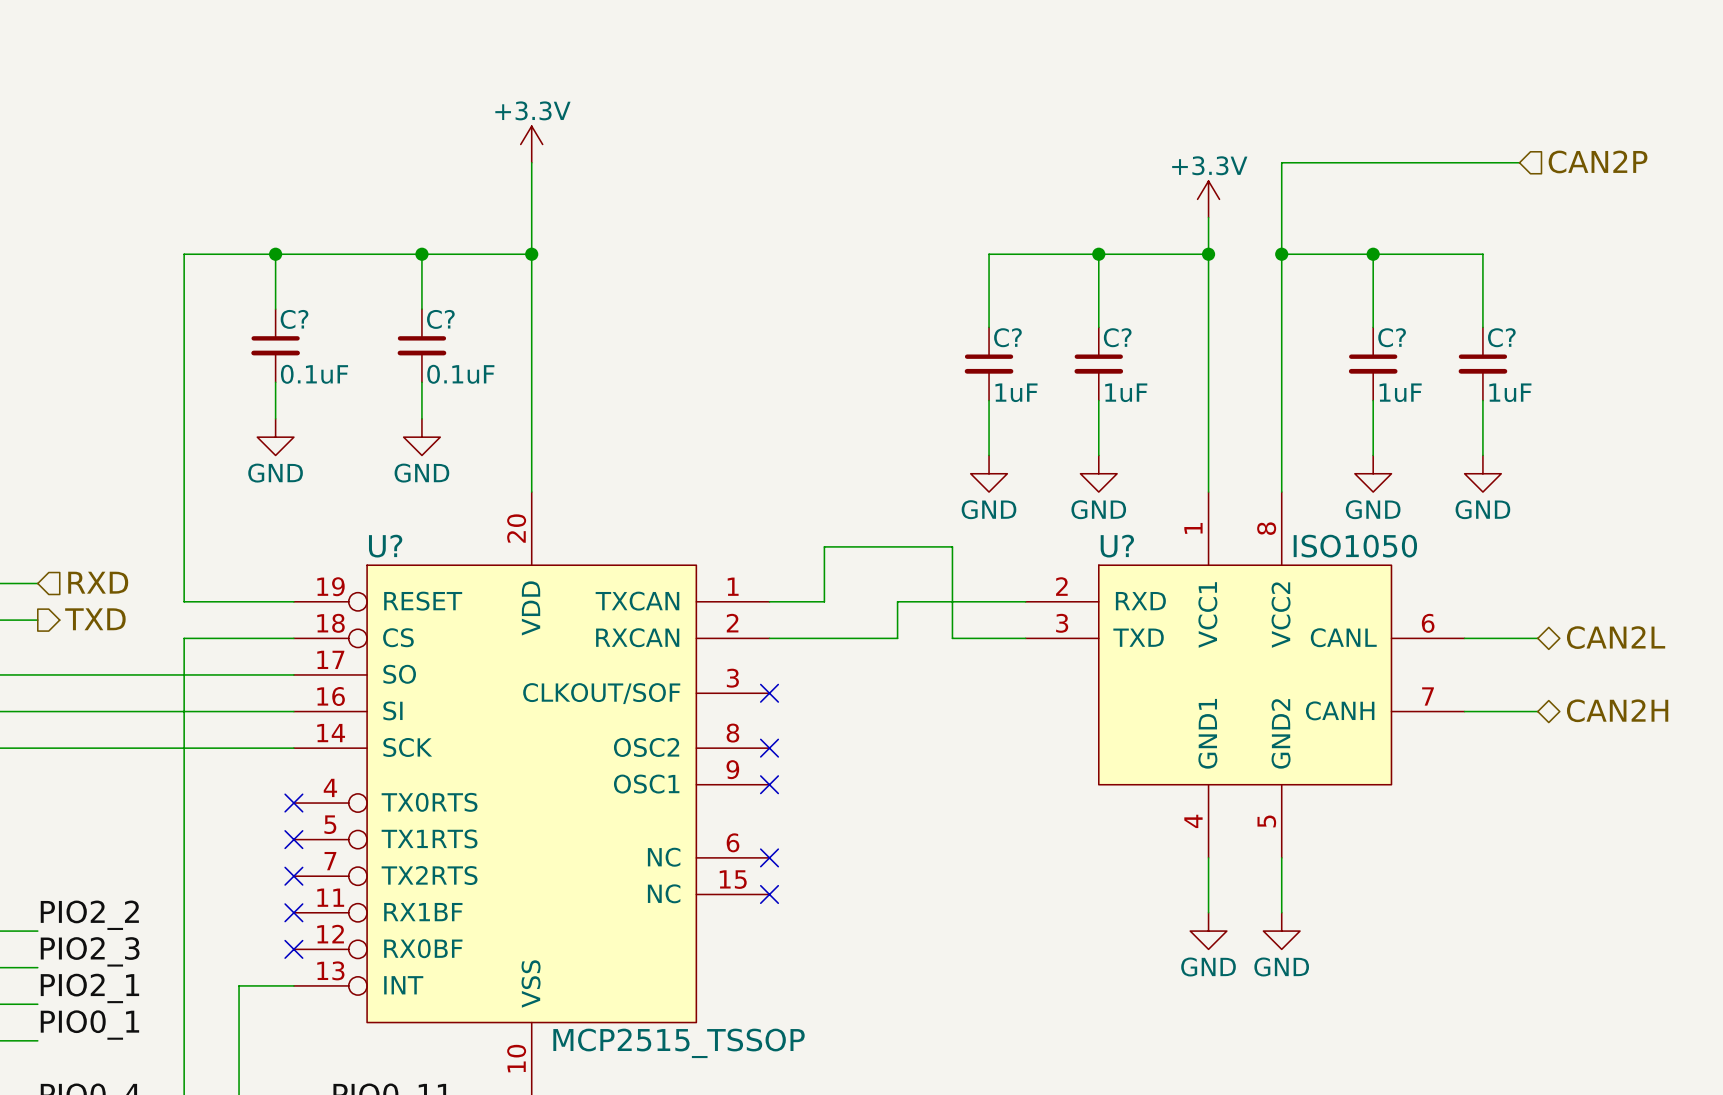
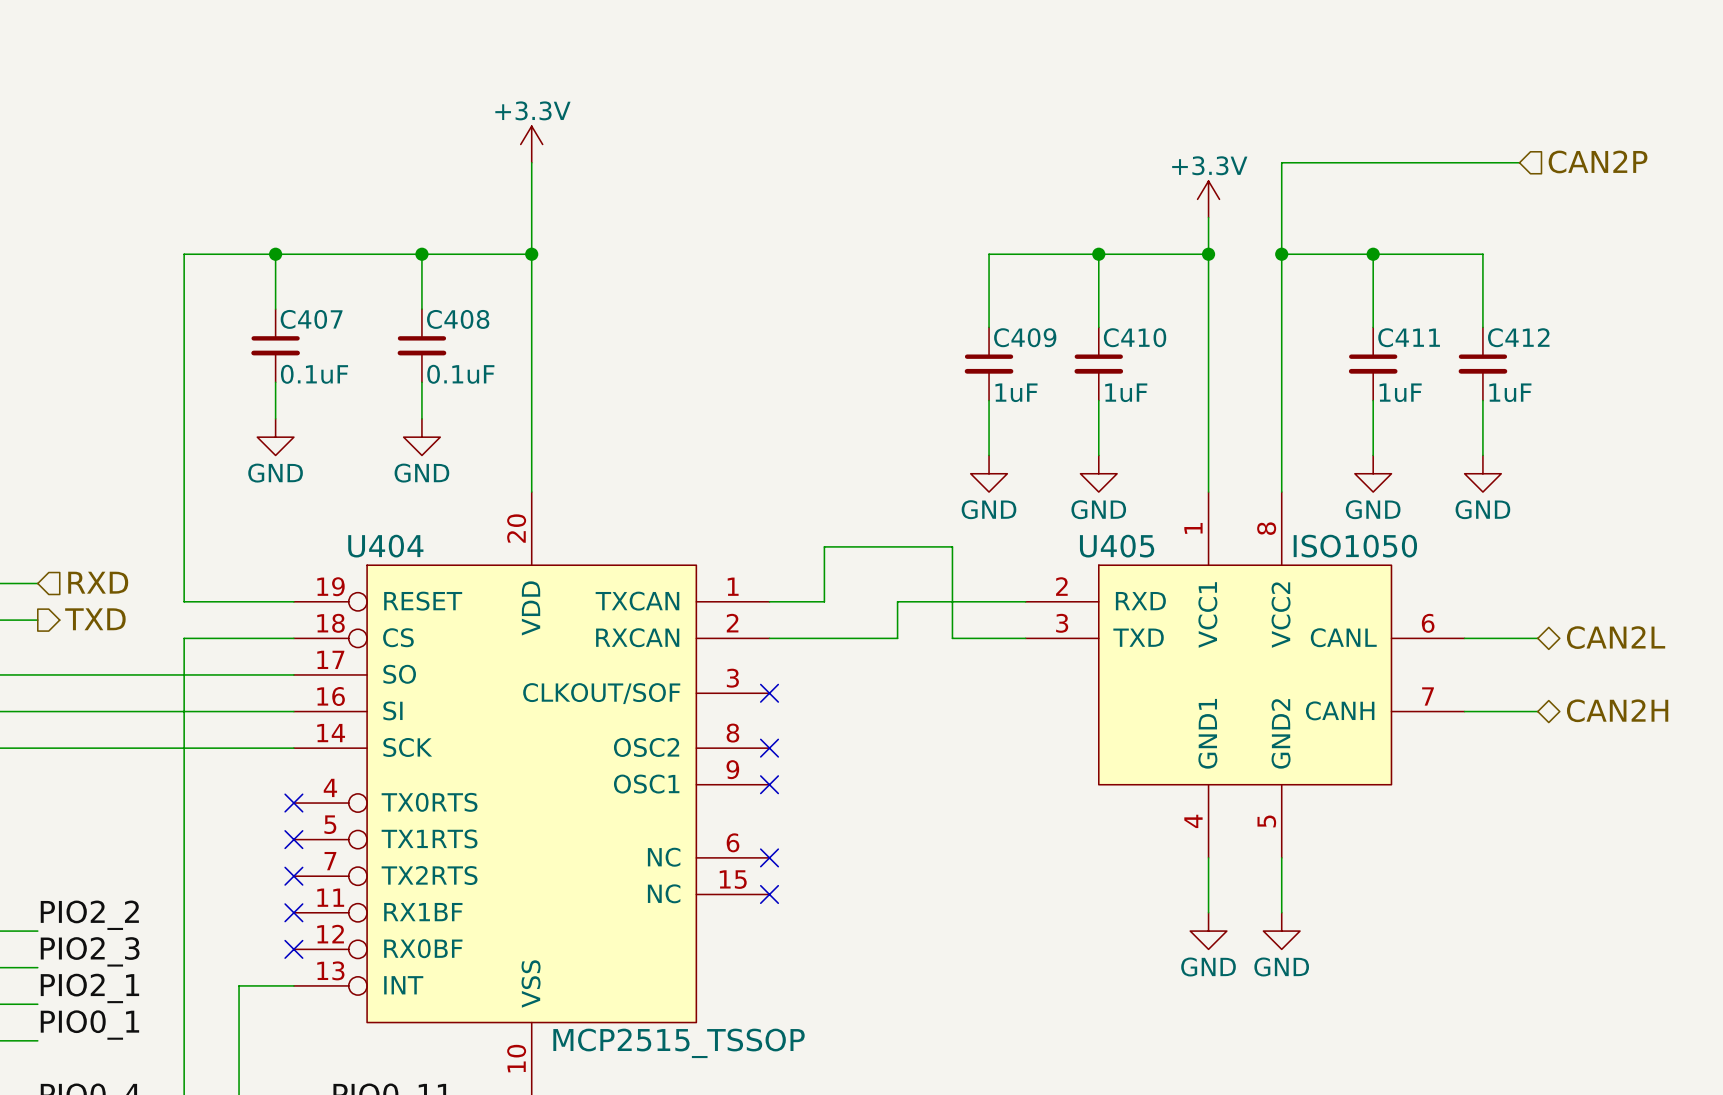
C? name: C? (294, 319) -> C407 (311, 319)
C? name: C? (440, 319) -> C408 (458, 319)
C? name: C? (1007, 337) -> C409 (1025, 337)
C? name: C? (1117, 337) -> C410 (1135, 337)
C? name: C? (1392, 337) -> C411 (1409, 337)
C? name: C? (1501, 337) -> C412 (1518, 337)
U? name: U? (385, 546) -> U404 (385, 546)
U? name: U? (1117, 546) -> U405 (1117, 546)

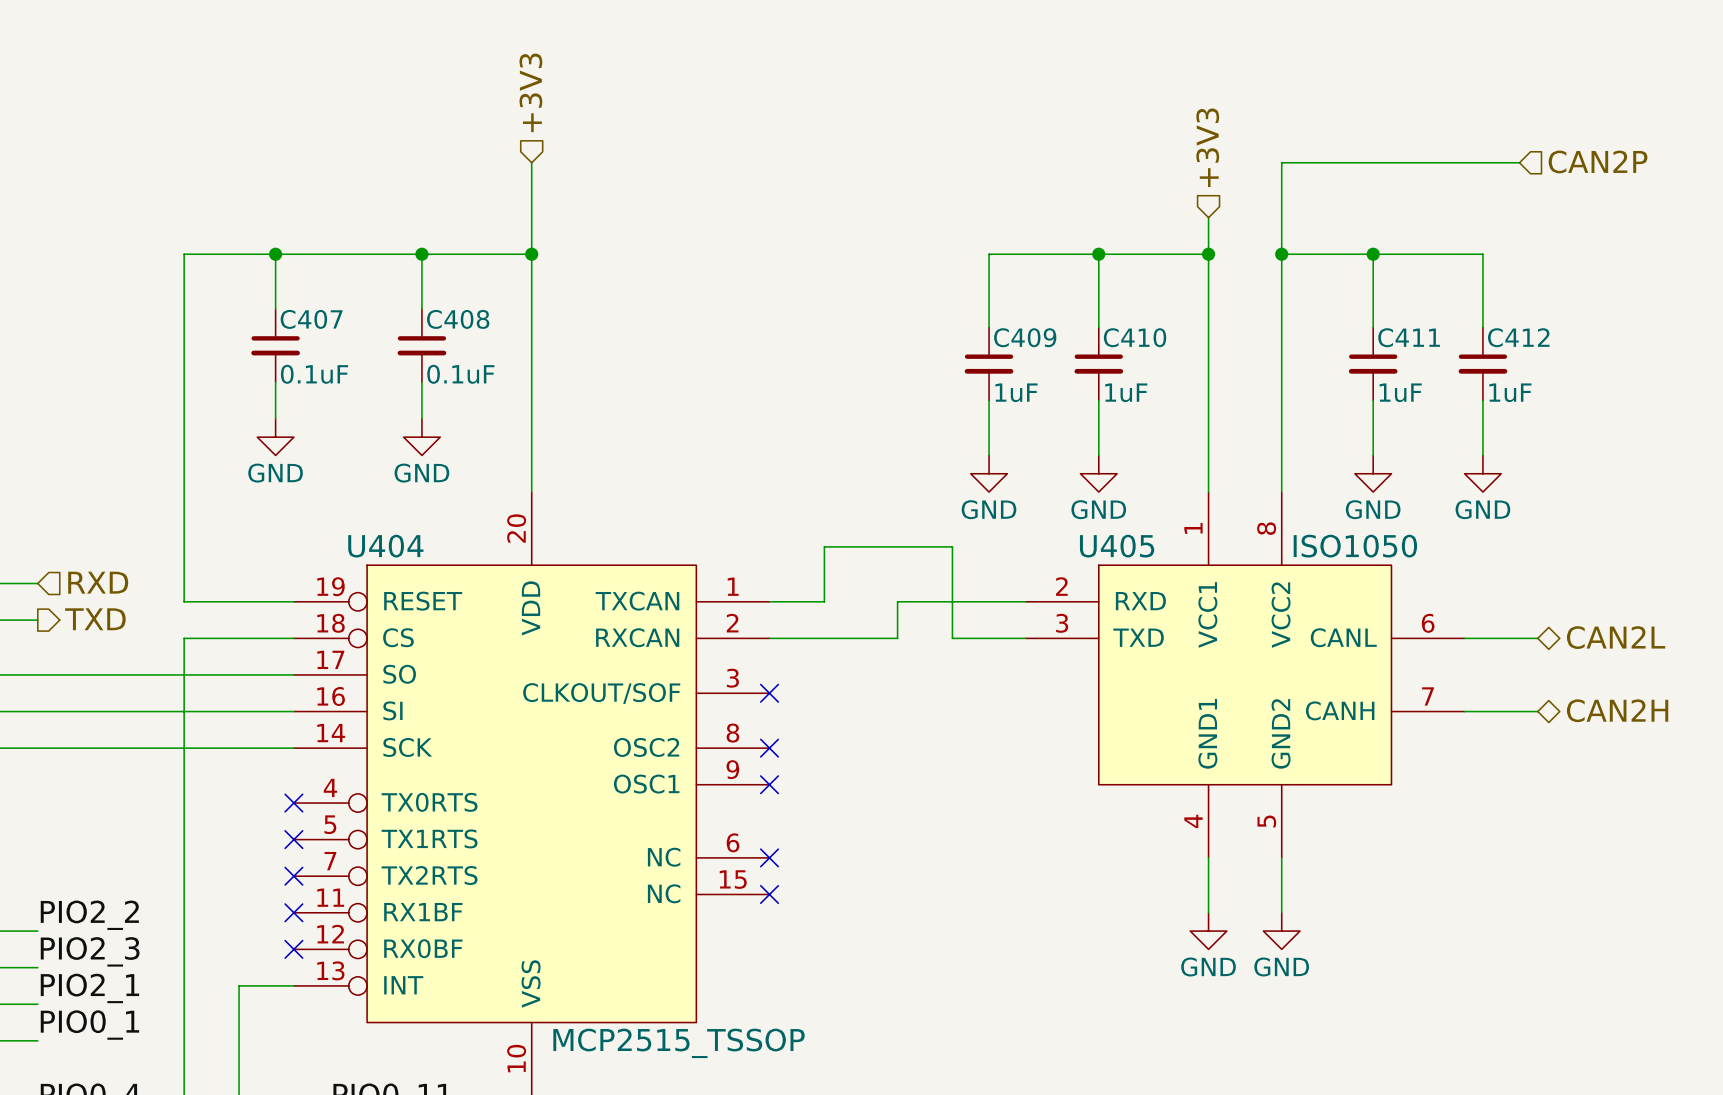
hierarchical label: none -> +3V3 (530, 92)
power symbol: +3.3V (531, 144) -> none
hierarchical label: none -> +3V3 (1207, 147)
power symbol: +3.3V (1208, 199) -> none

